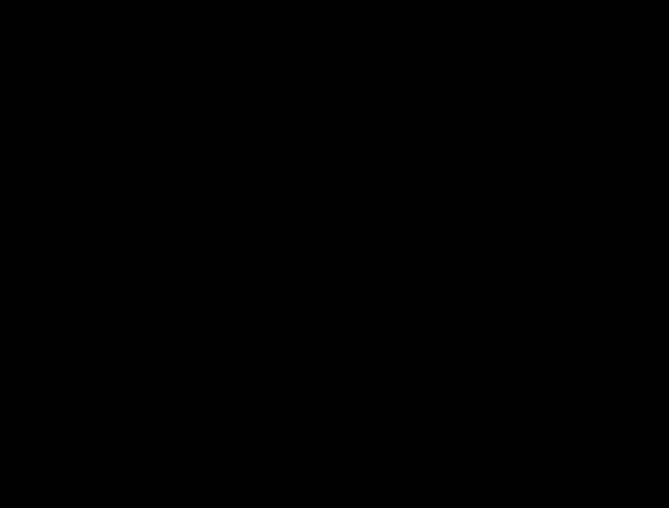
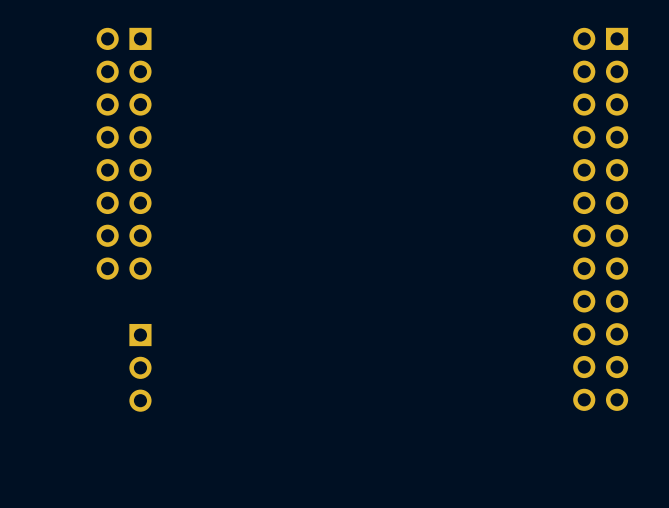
part: none -> (124, 153)
part: none -> (600, 219)
part: none -> (140, 367)

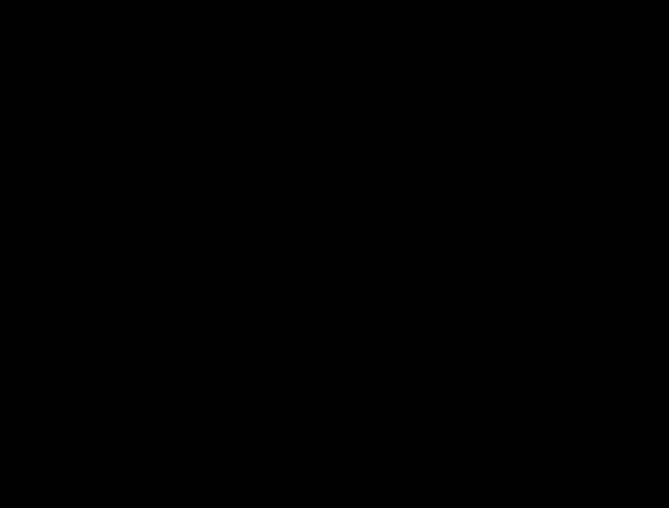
part: (124, 153) -> none
part: (600, 219) -> none
part: (140, 367) -> none

